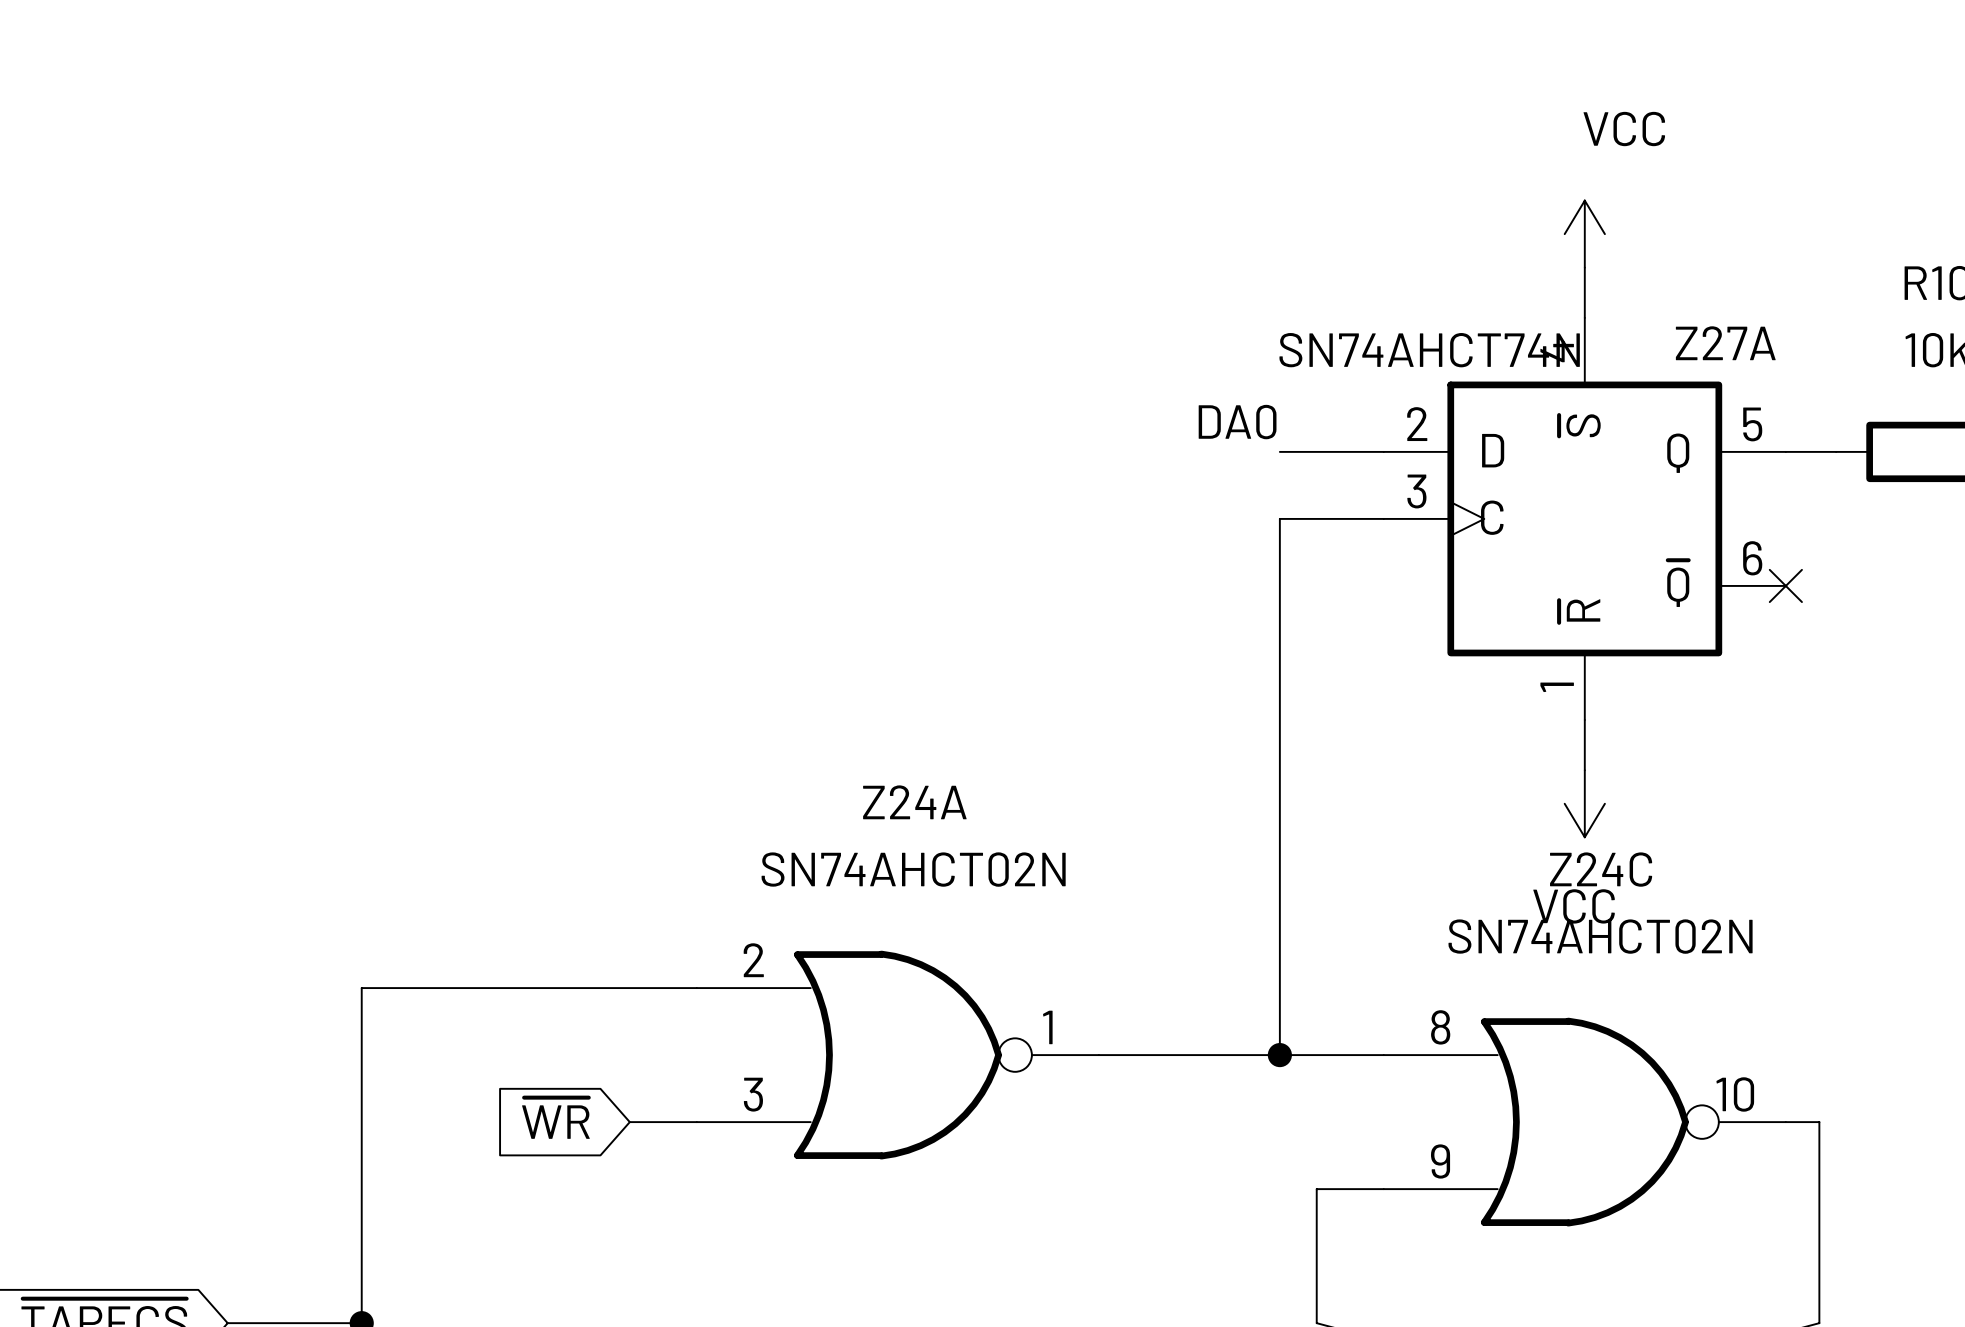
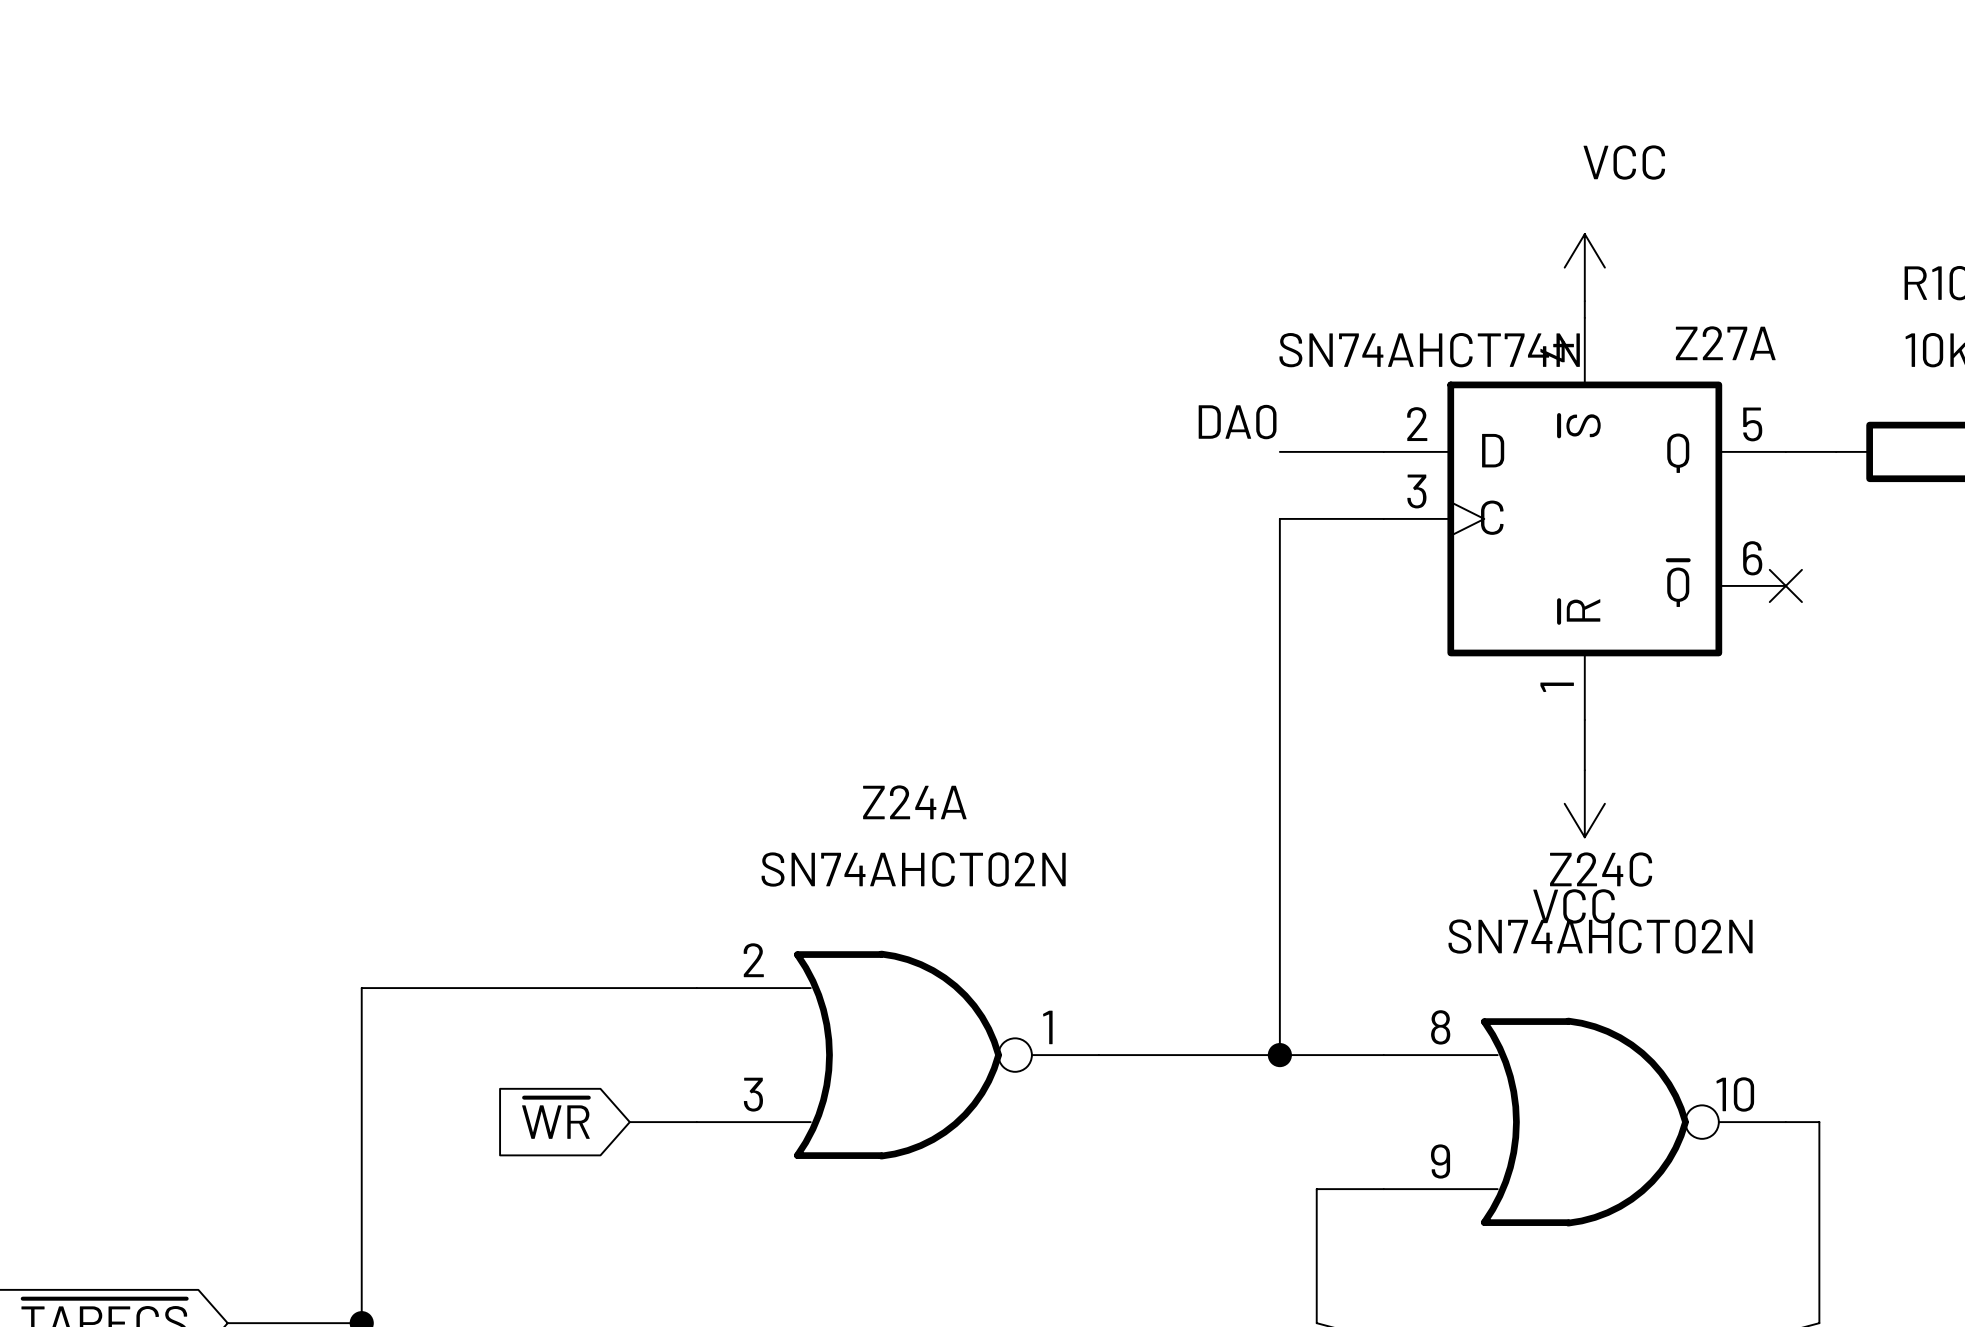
power symbol position: VCC (1584, 234) -> VCC (1584, 267)

